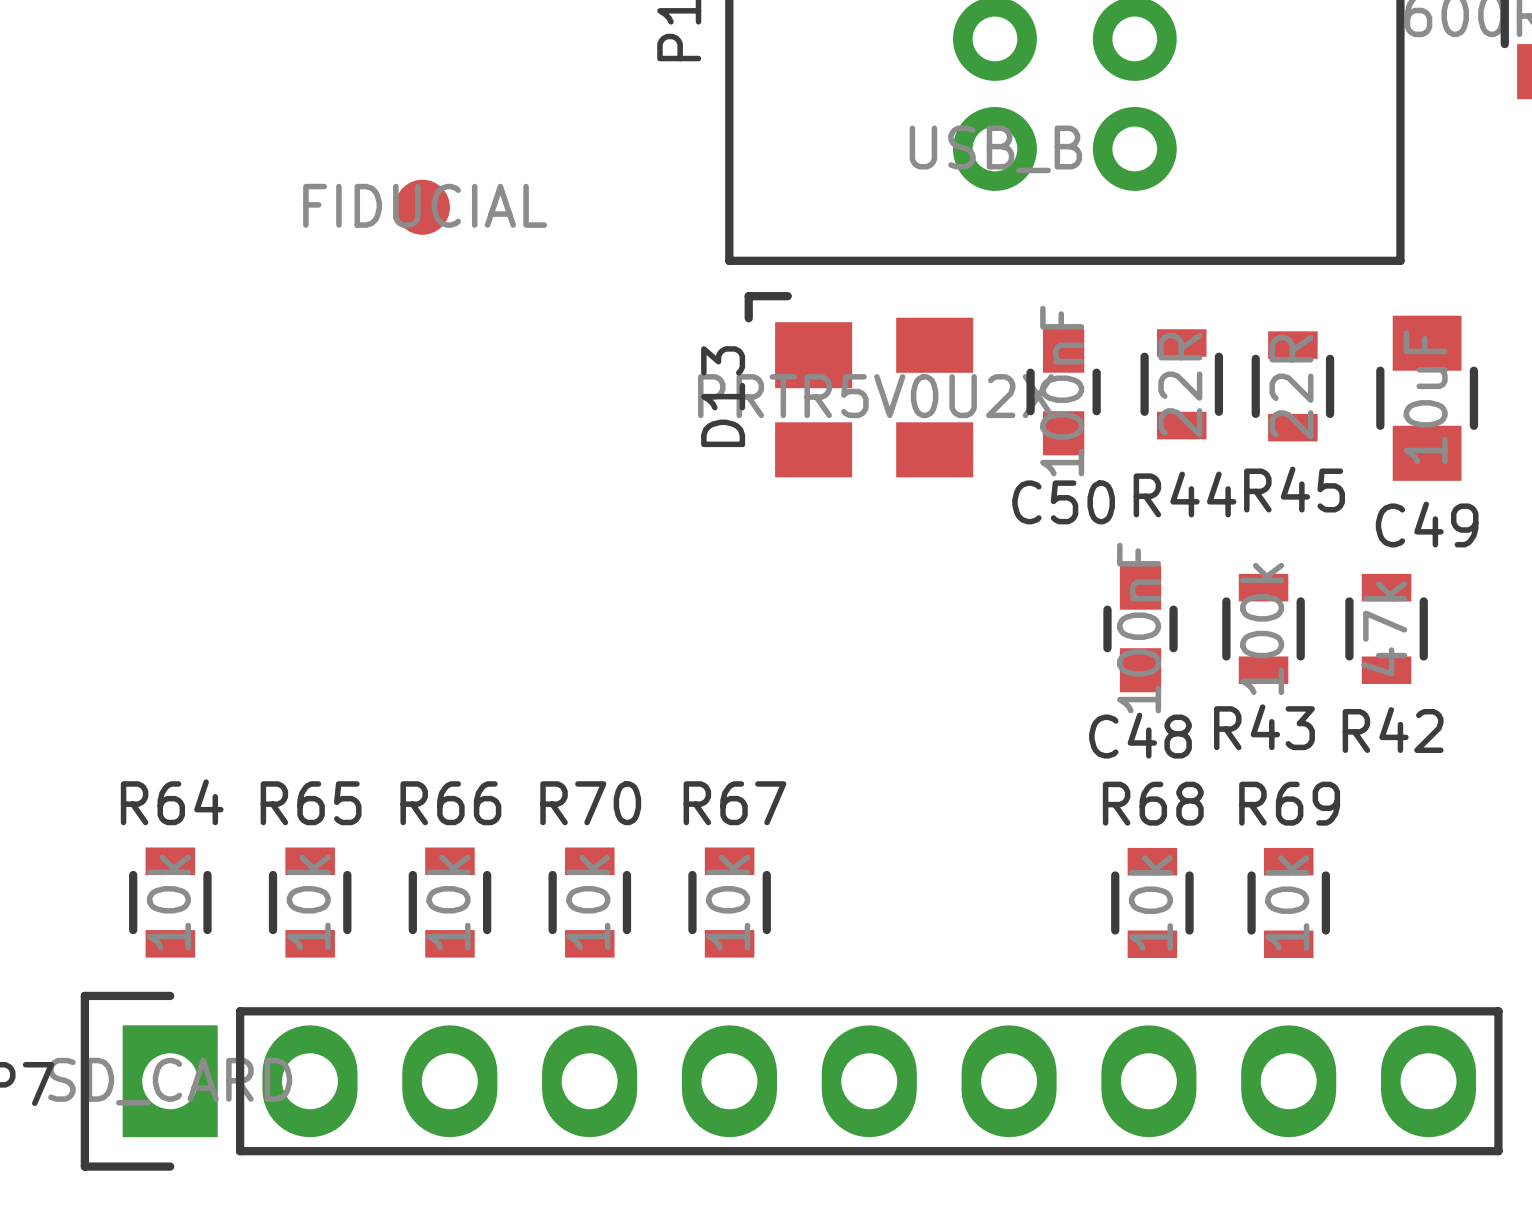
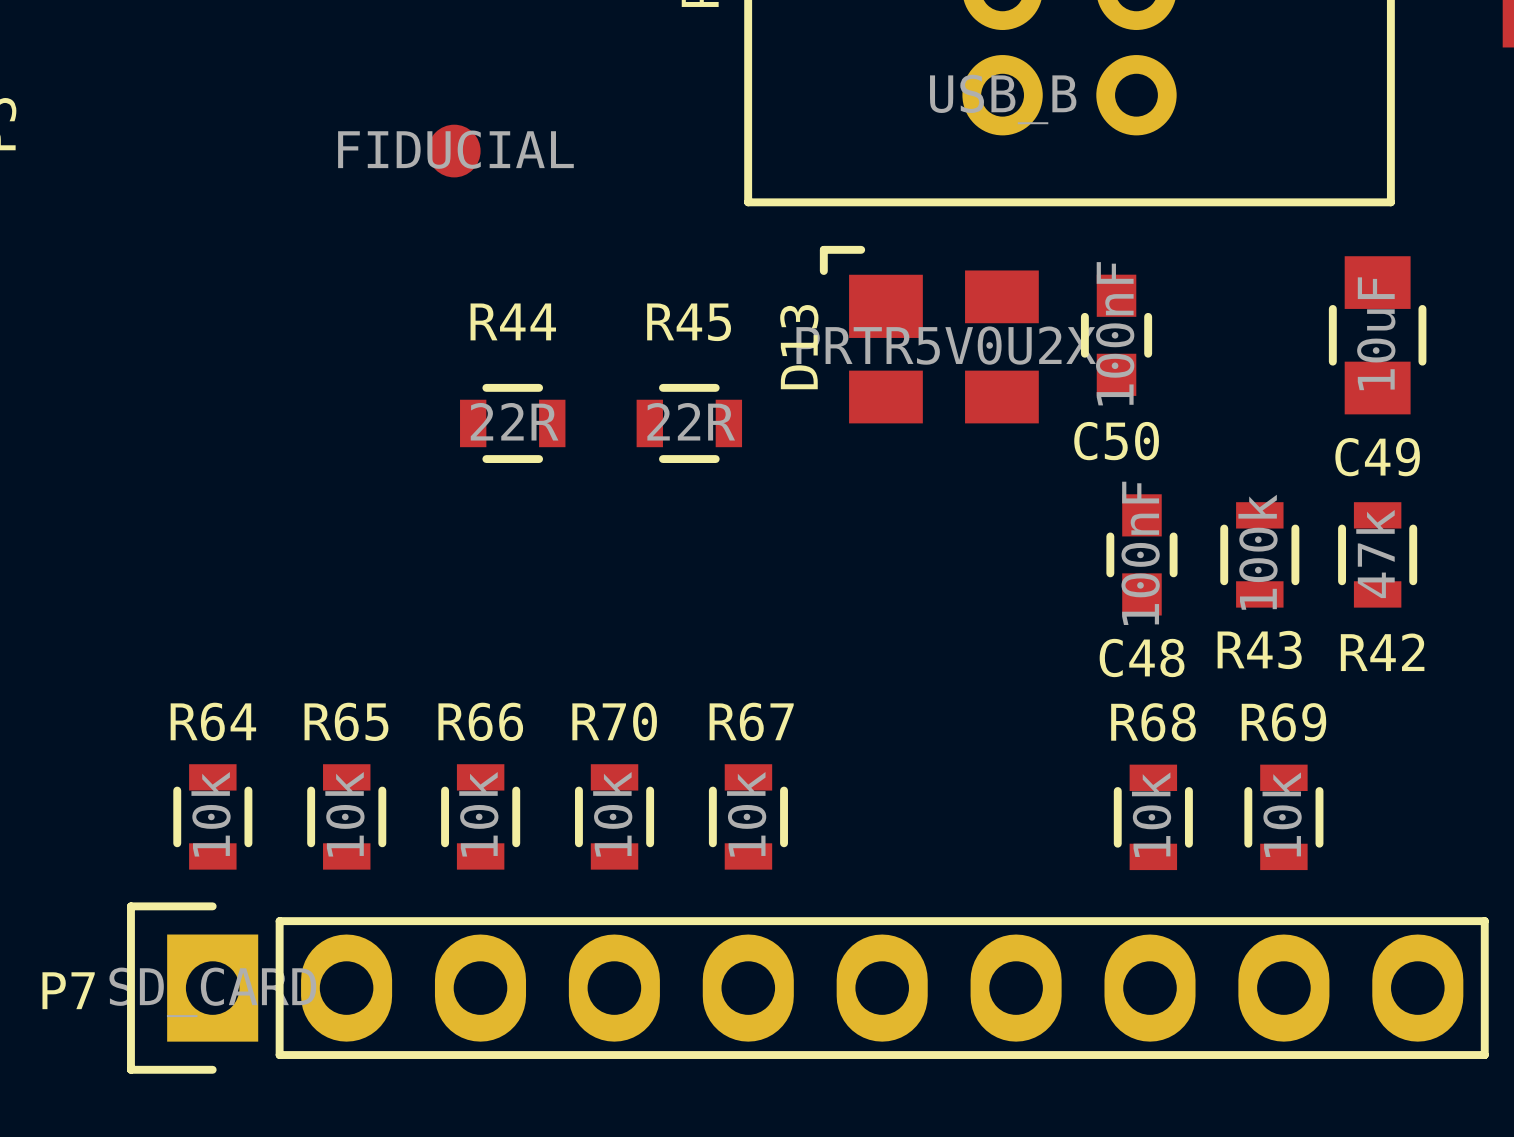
D13 position: (858, 384) -> (929, 334)
R44 rotation: 0° (1181, 384) -> 90° clockwise (512, 423)
R44 position: (1181, 384) -> (512, 423)
R45 rotation: 0° (1292, 386) -> 90° clockwise (689, 423)
R45 position: (1292, 386) -> (689, 423)
C50 position: (1063, 391) -> (1116, 335)
C49 position: (1427, 398) -> (1377, 335)
R45 name position: R45 (1294, 489) -> R45 (689, 322)
R44 name position: R44 (1184, 494) -> R44 (513, 321)

